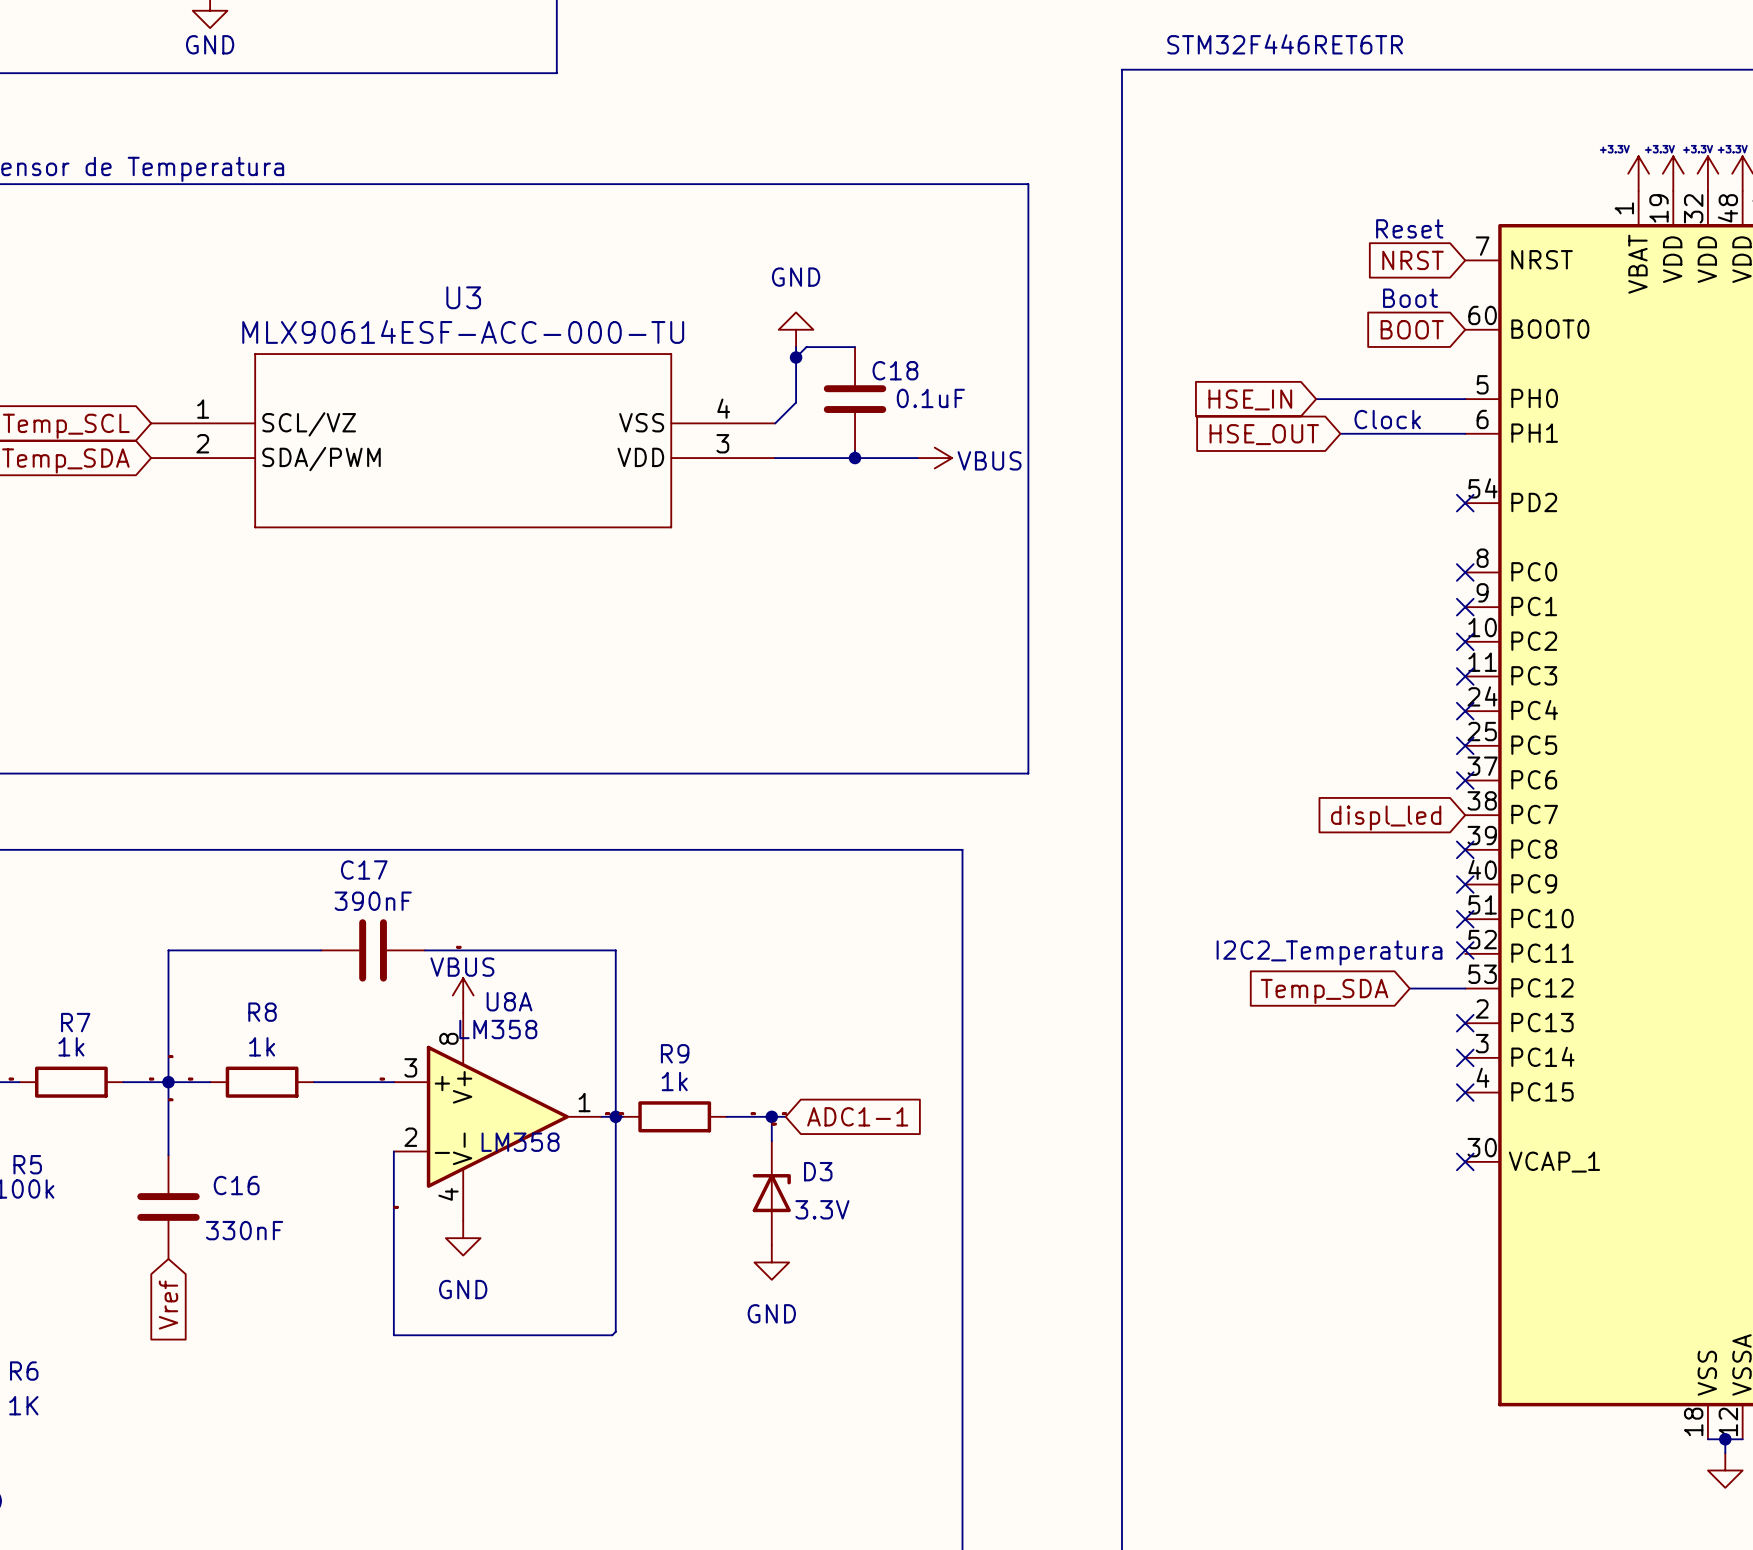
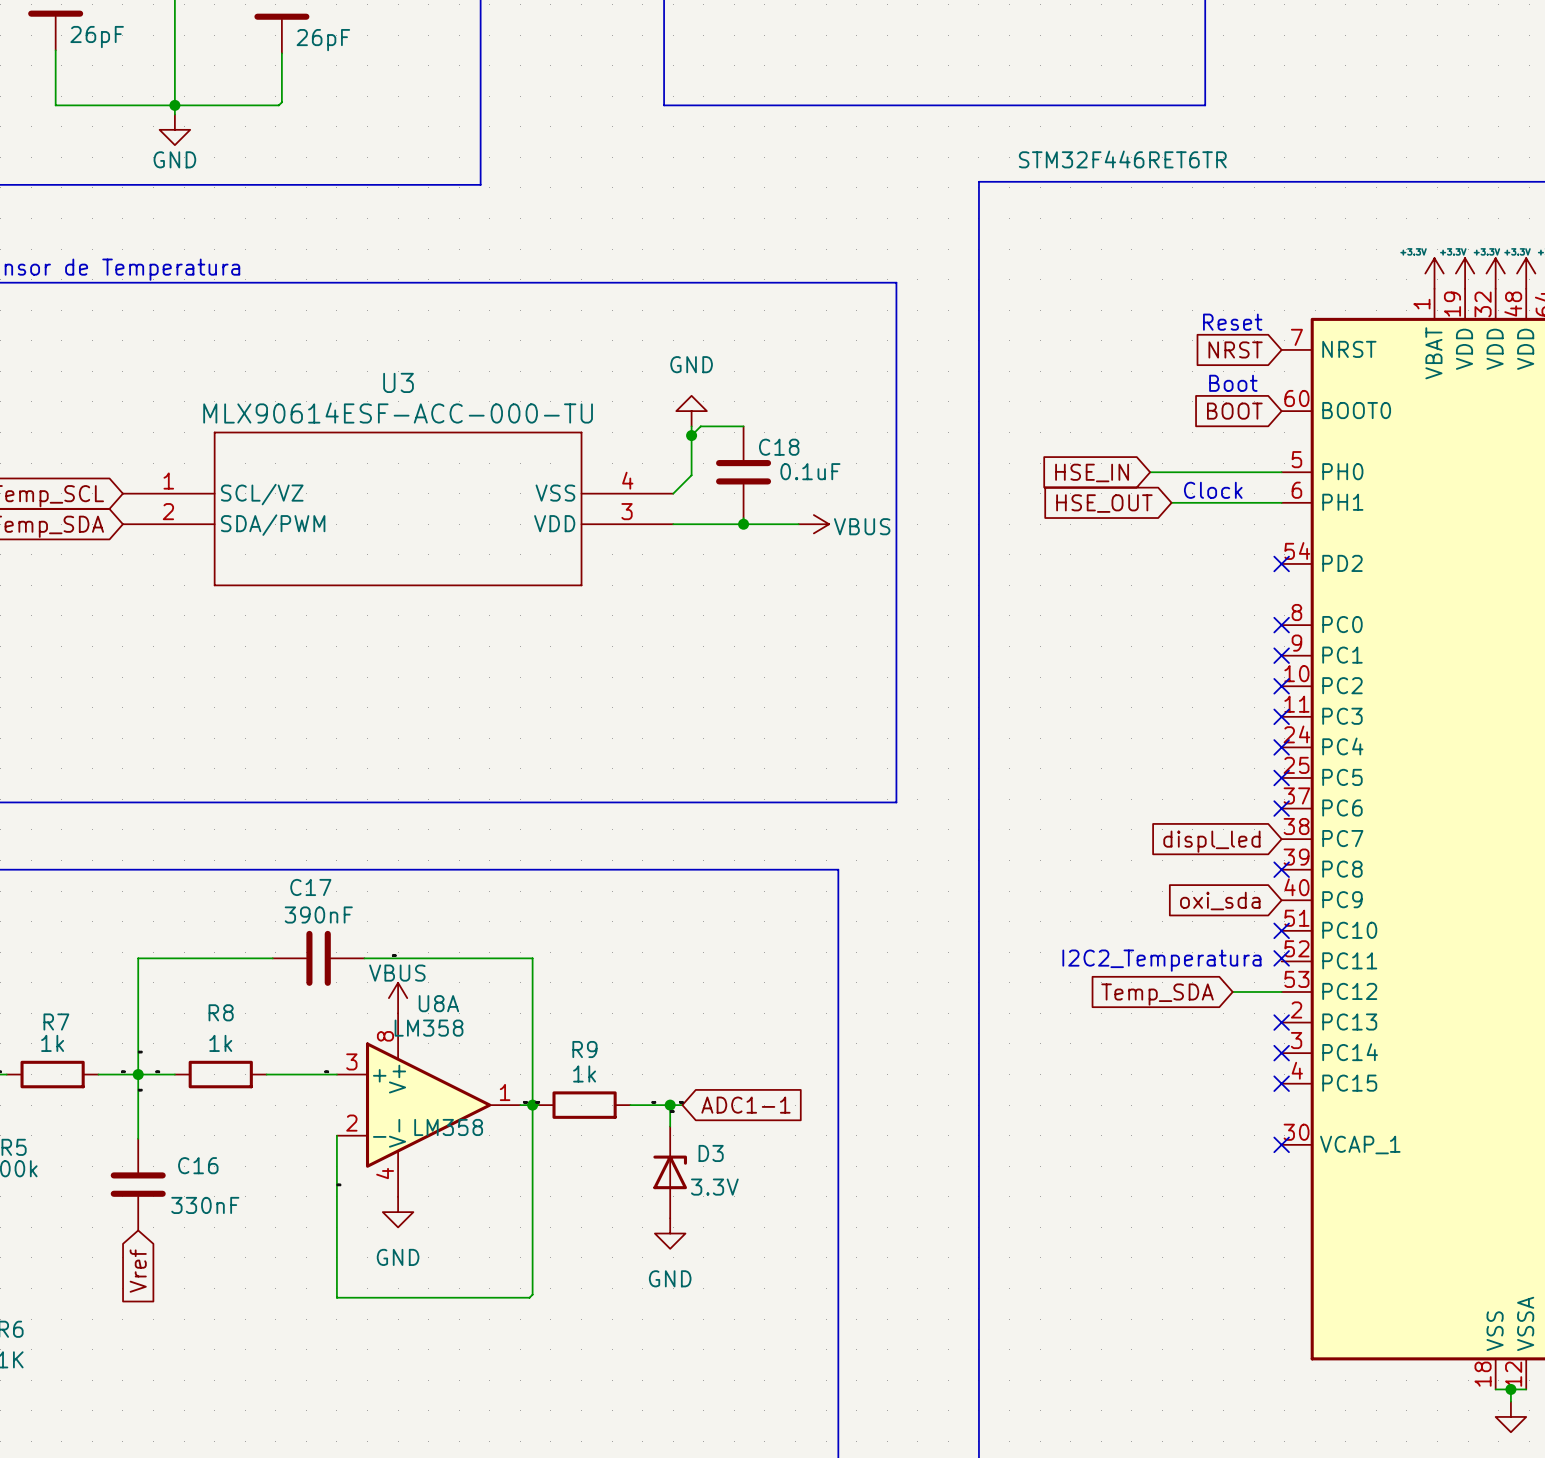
no-connect mark: (1465, 884) -> none
global label: none -> oxi_sda (1220, 901)

